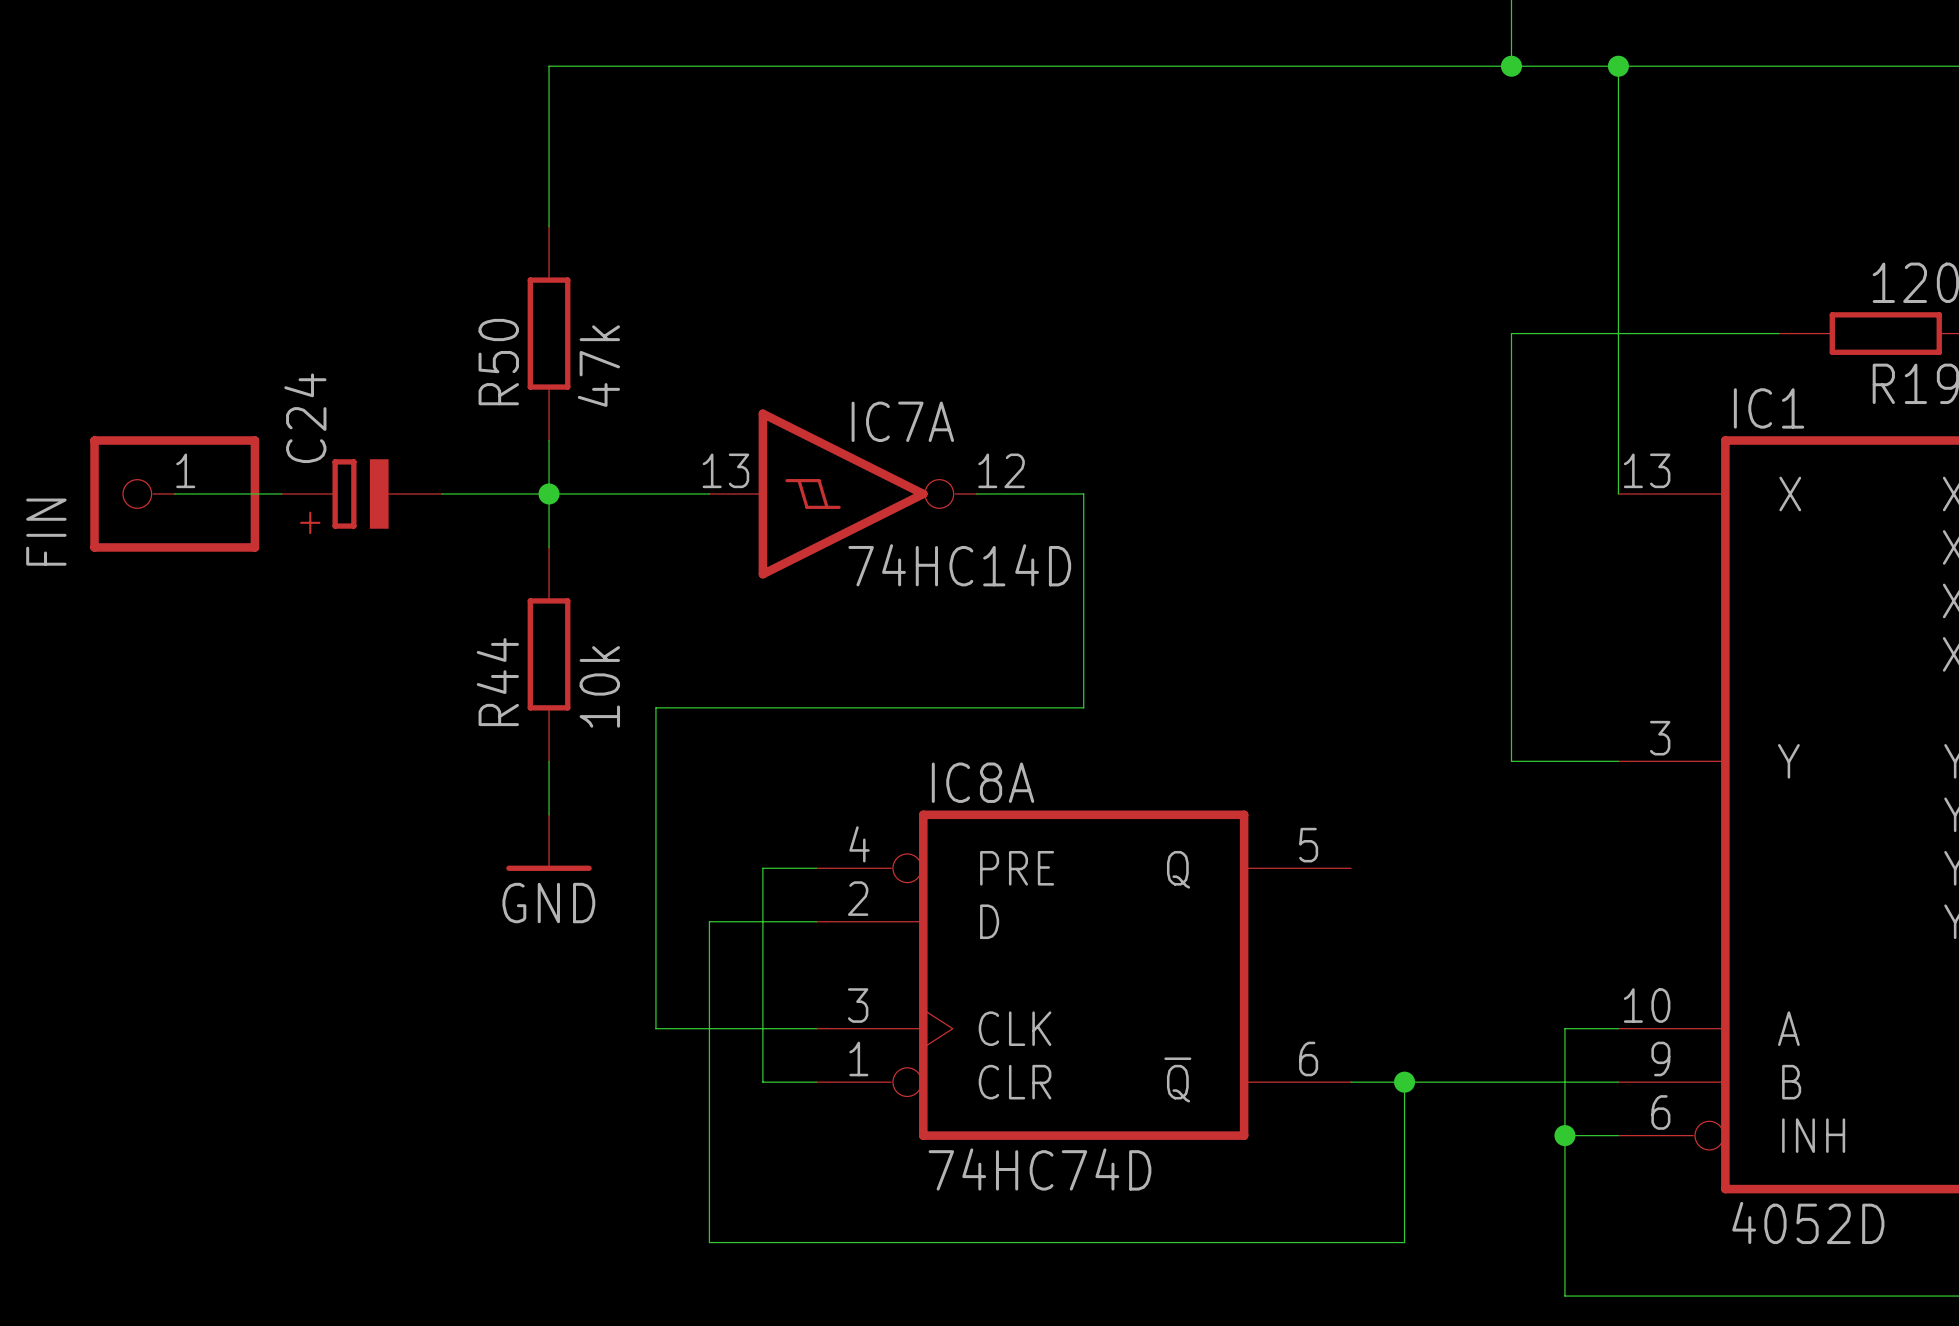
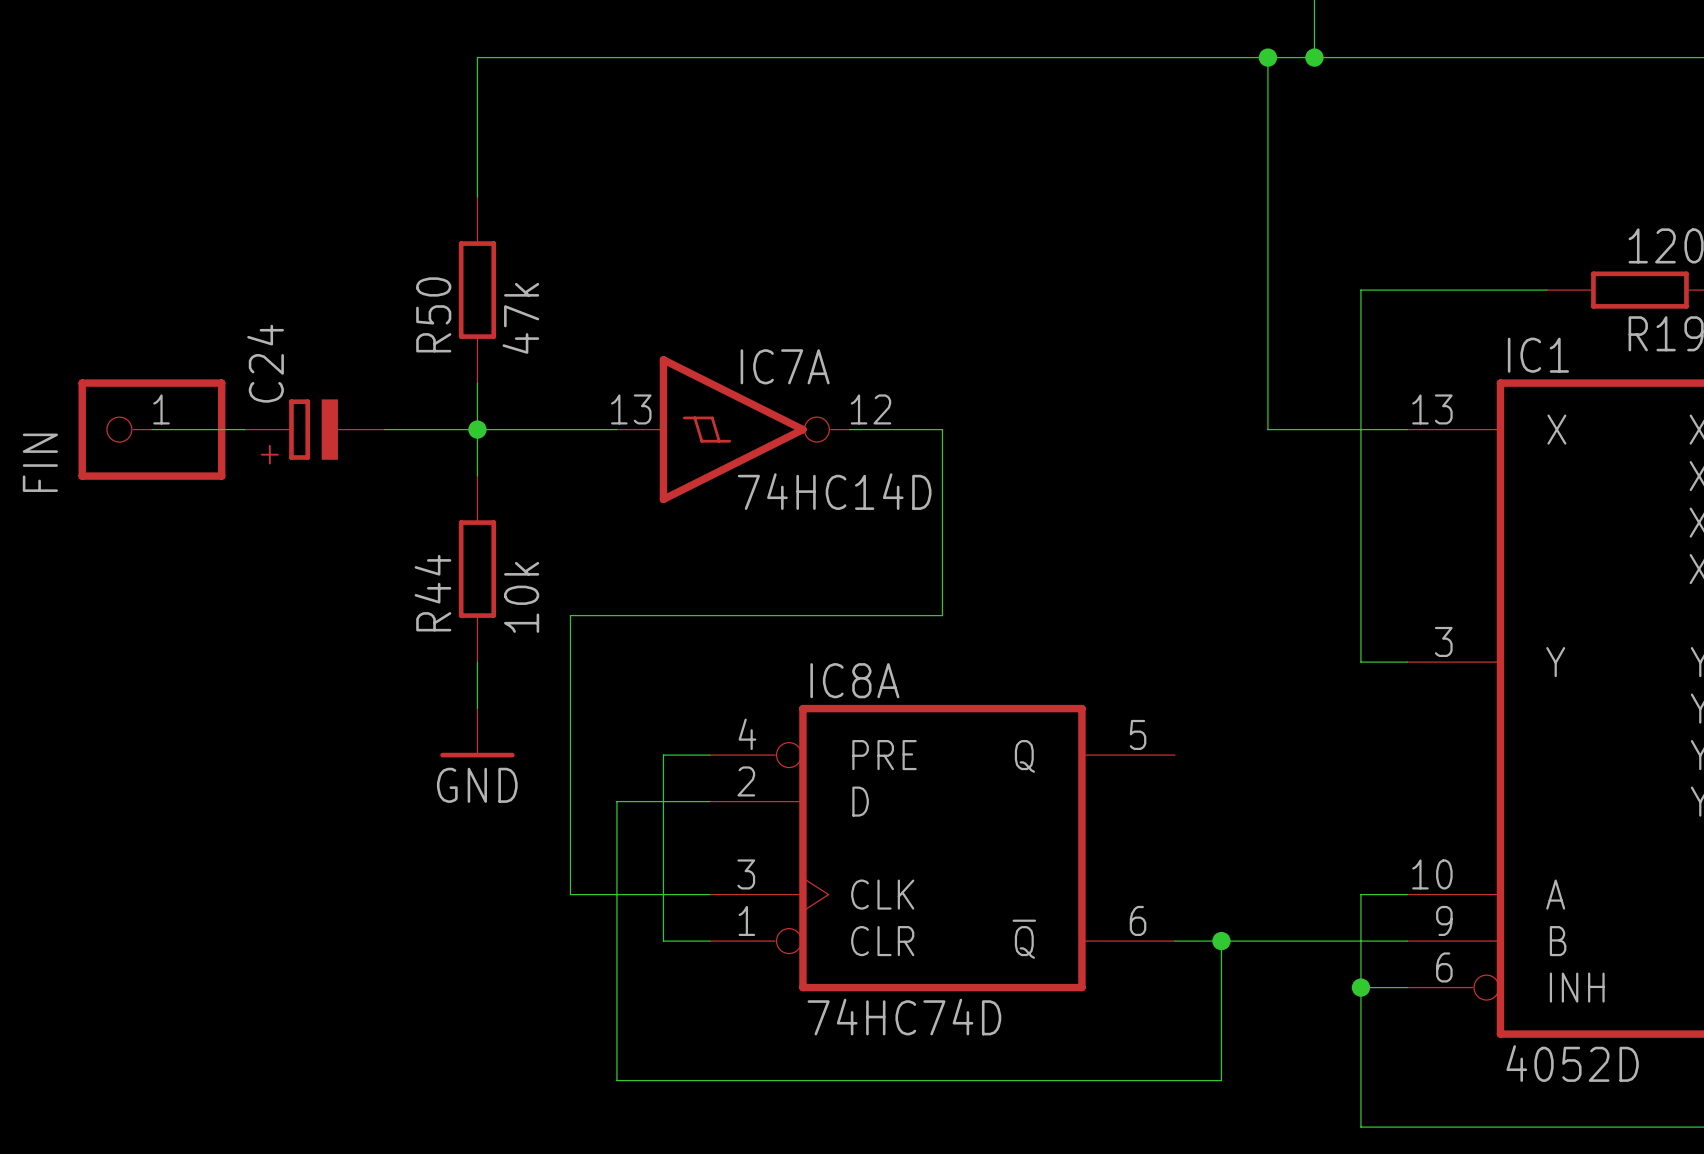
junction: none -> (1267, 57)
wire: (1618, 66) (1618, 493) -> (1267, 57) (1267, 429) (1407, 429)
junction: (1618, 66) -> none
wire: (1564, 333) (1511, 333) (1511, 761) (1564, 761) -> (1360, 290) (1360, 662)

